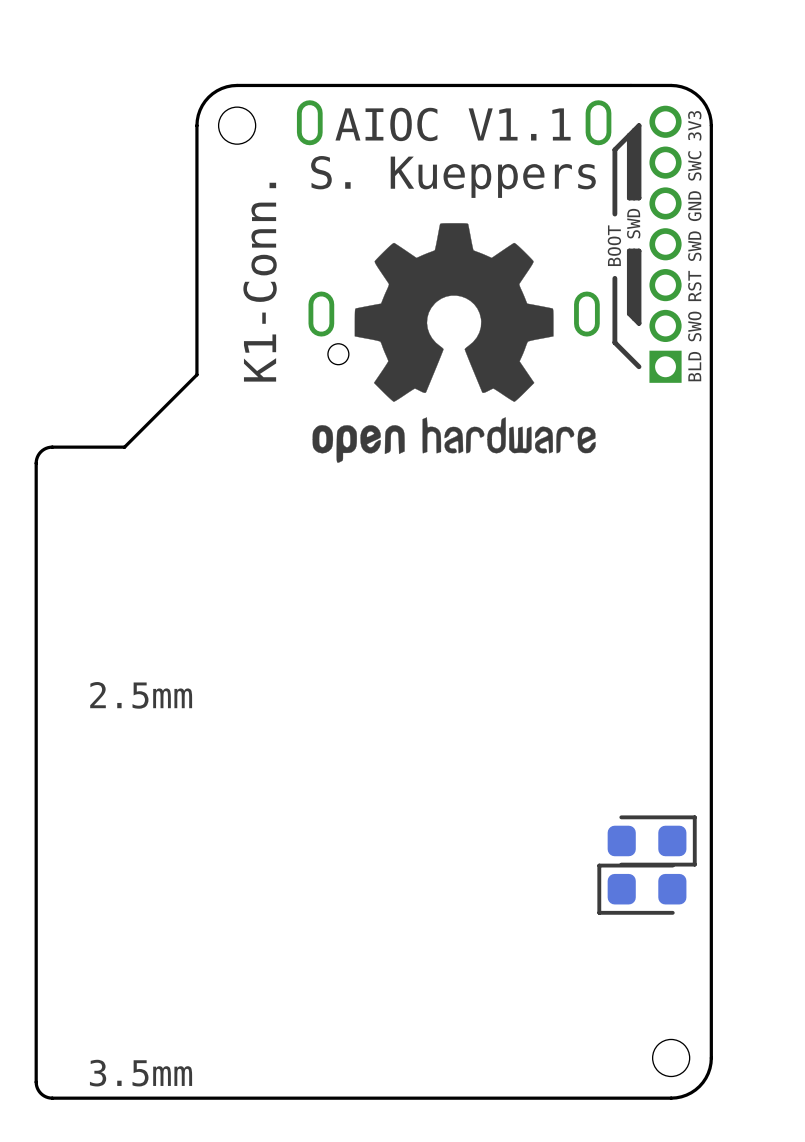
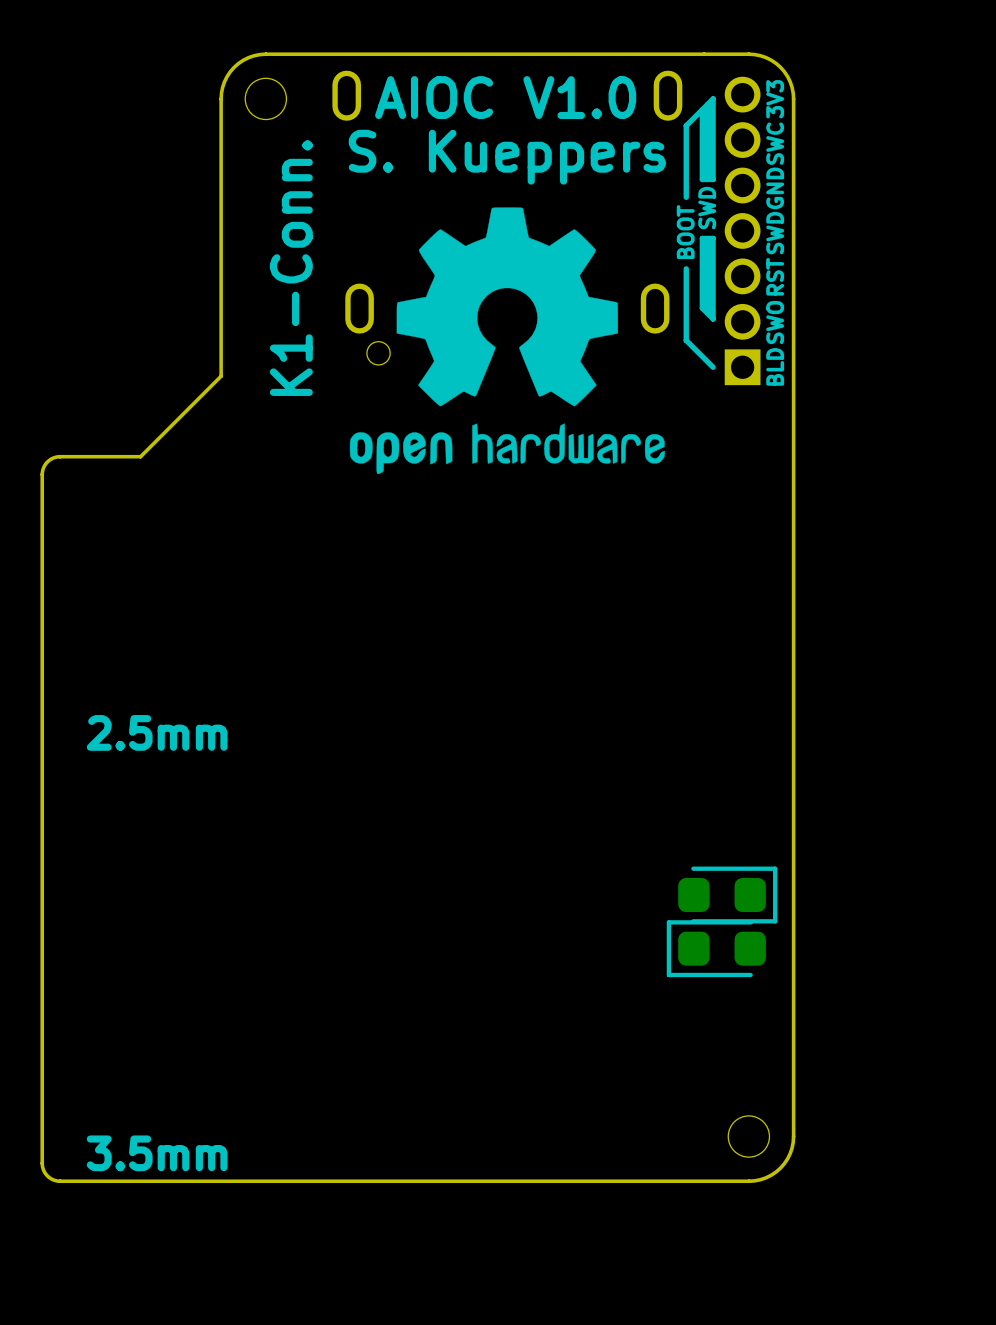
text: AIOC V1.1 (453, 124) -> AIOC V1.0 (505, 97)

